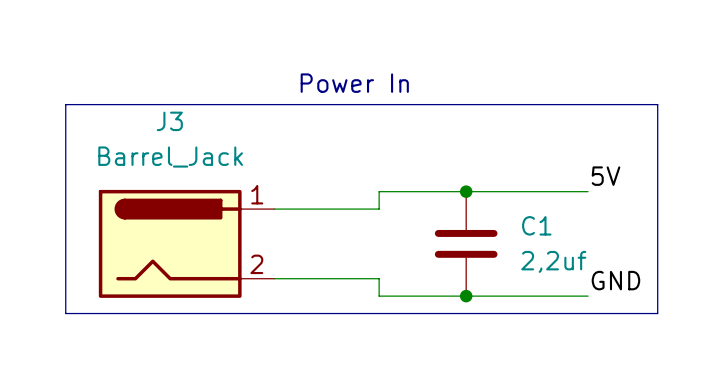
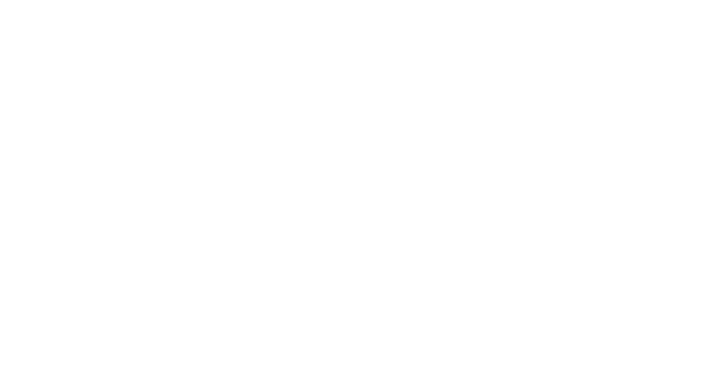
text: Power In (354, 83) -> none
line: (65, 104) (657, 104) (657, 313) (65, 313) (65, 104) -> none
label: 5V (606, 176) -> none
junction: (466, 191) -> none
wire: (588, 191) (379, 191) (379, 209) (274, 209) -> none
J3: Barrel_Jack (186, 243) -> none
C1: 2,2uf (466, 243) -> none
wire: (274, 278) (379, 278) (379, 296) (588, 296) -> none
label: GND (615, 280) -> none
junction: (466, 296) -> none

